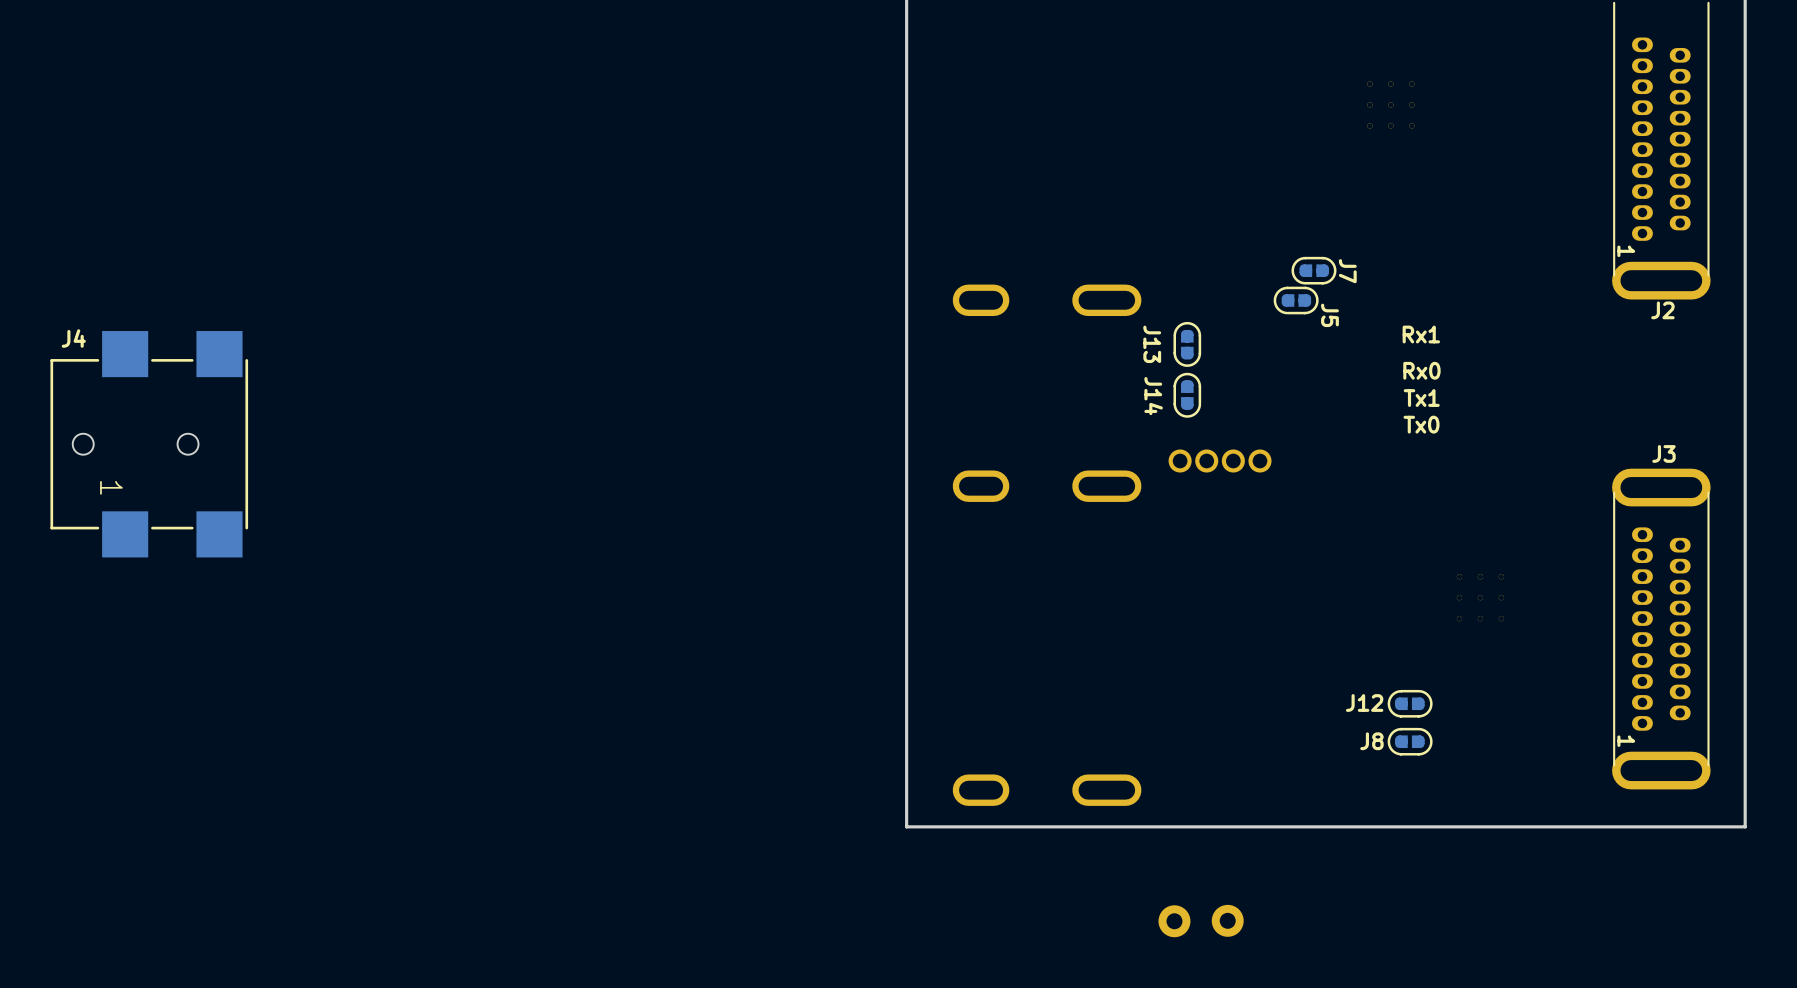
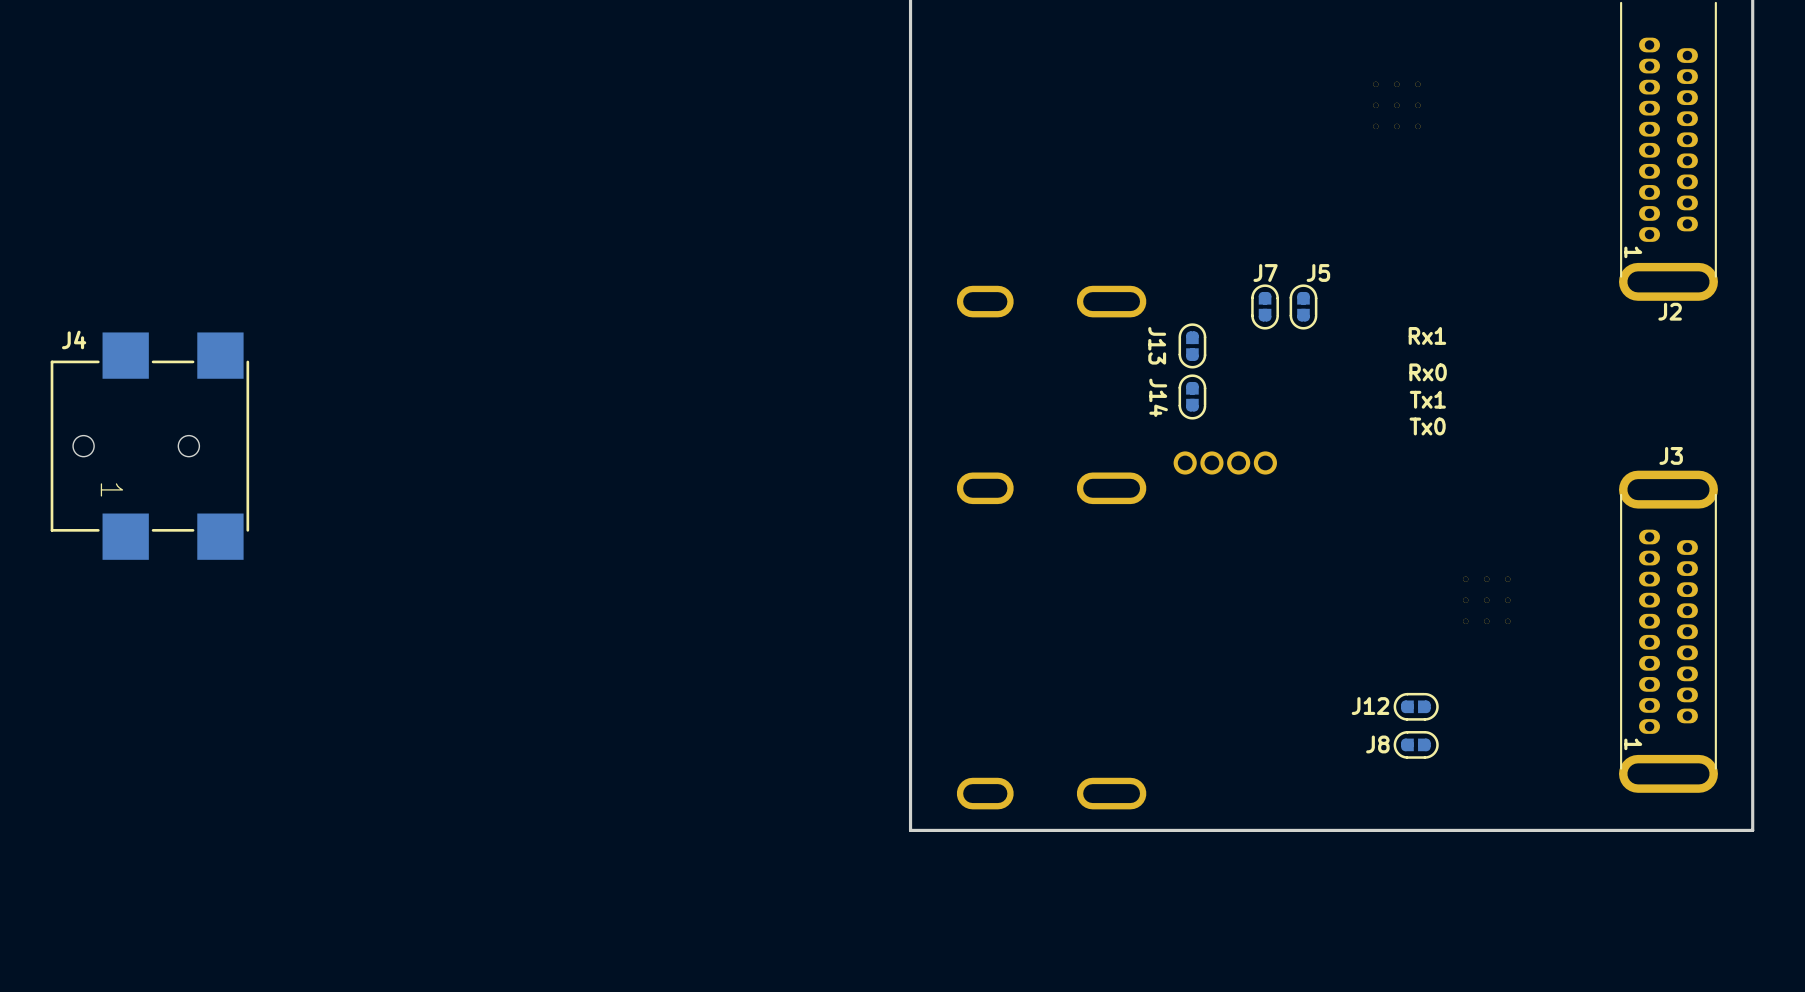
J7 rotation: 0° (1313, 270) -> 90° counterclockwise (1265, 306)
J7 position: (1313, 270) -> (1265, 306)
J5 rotation: 0° (1296, 300) -> 90° counterclockwise (1303, 306)
part: (1201, 921) -> none

